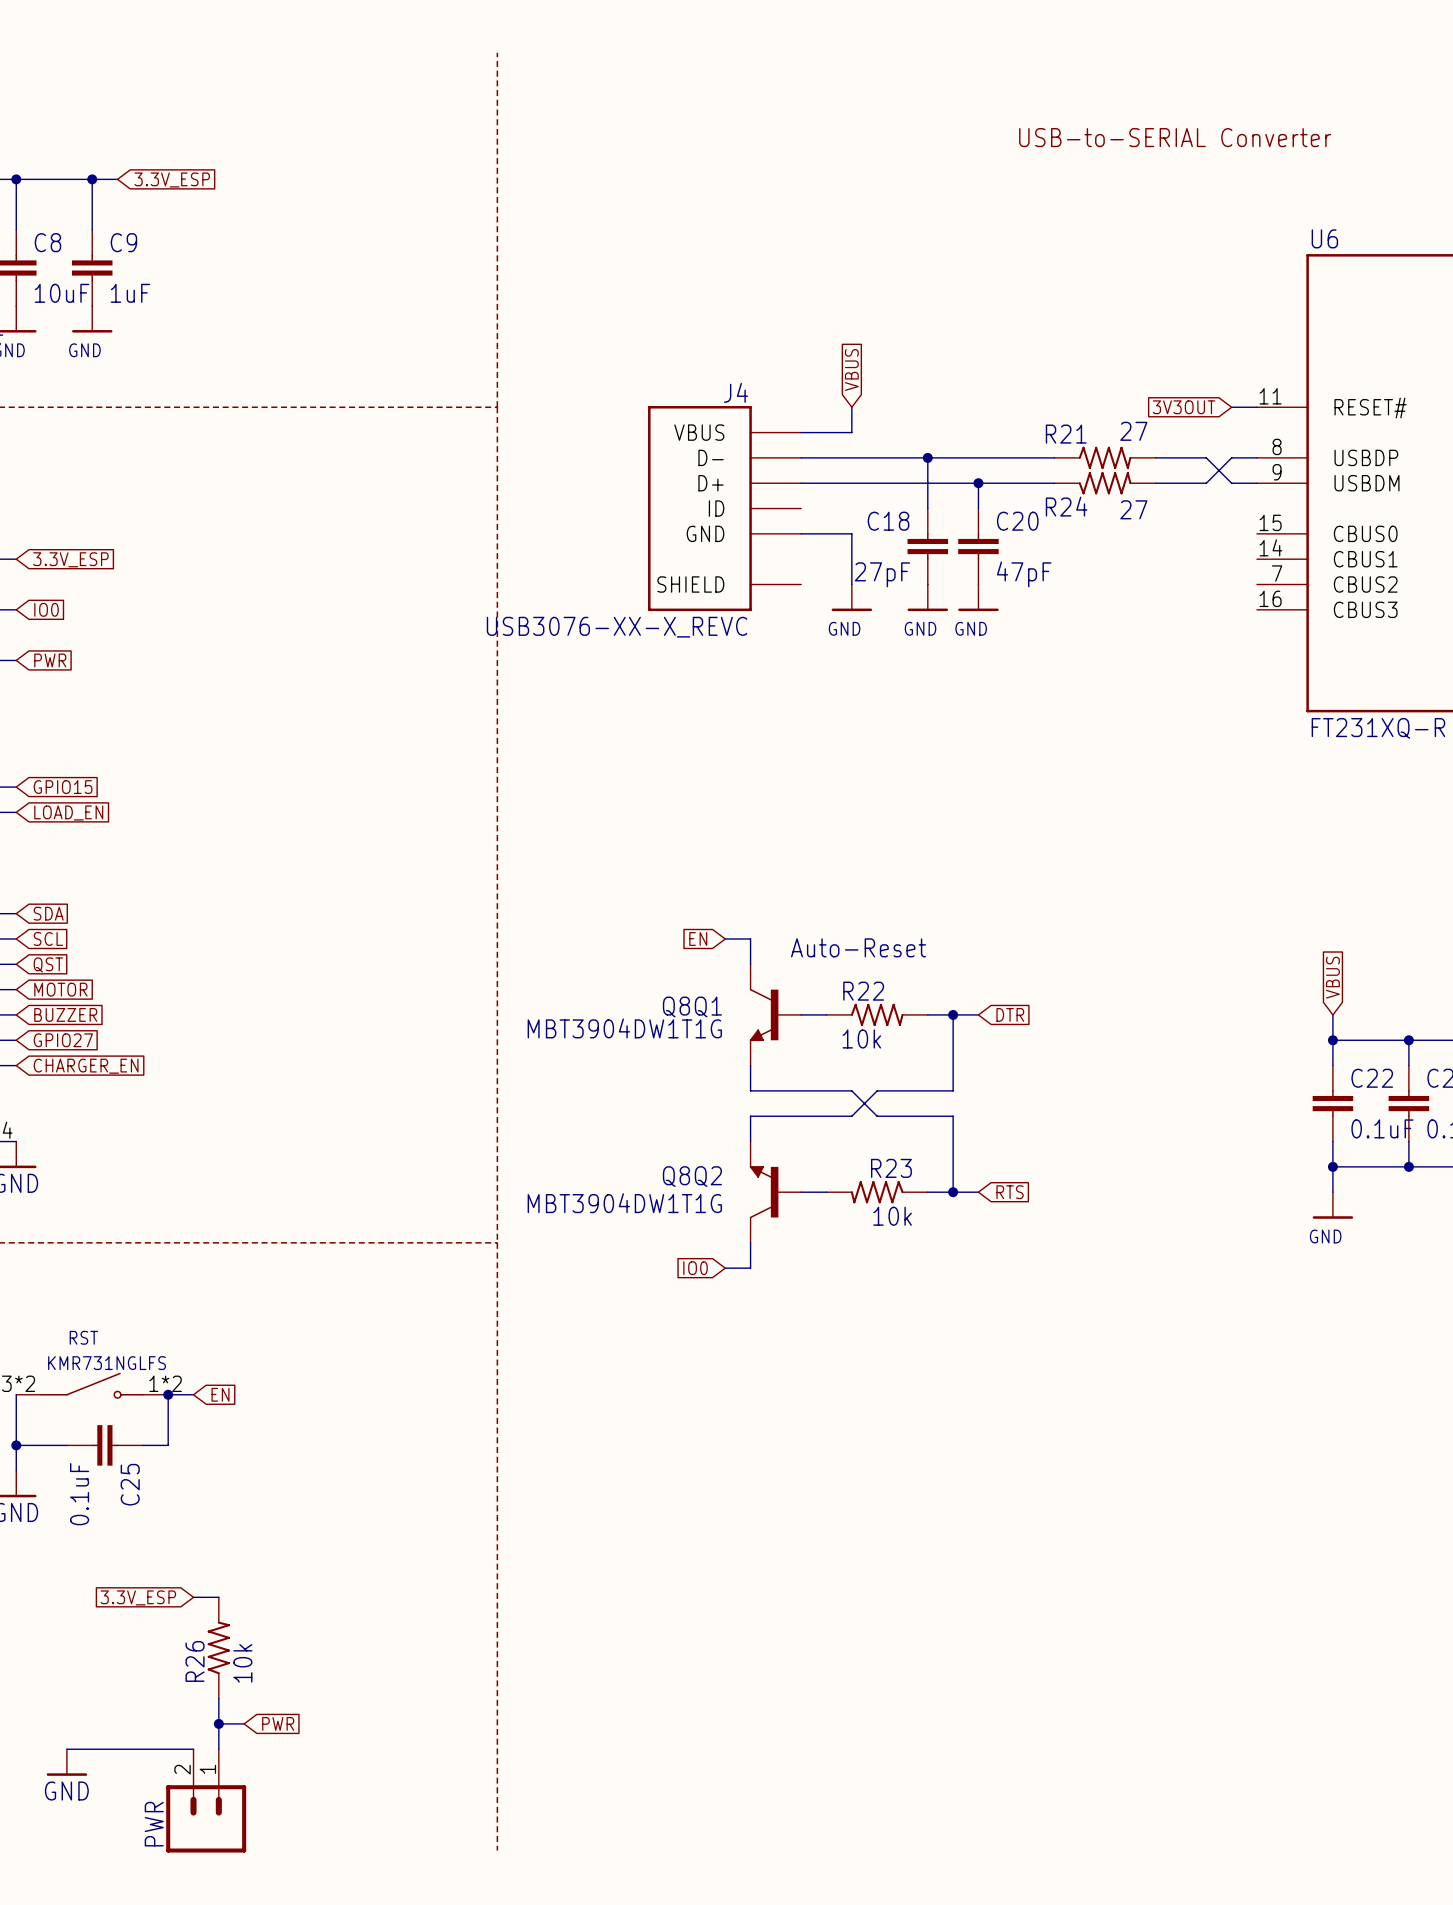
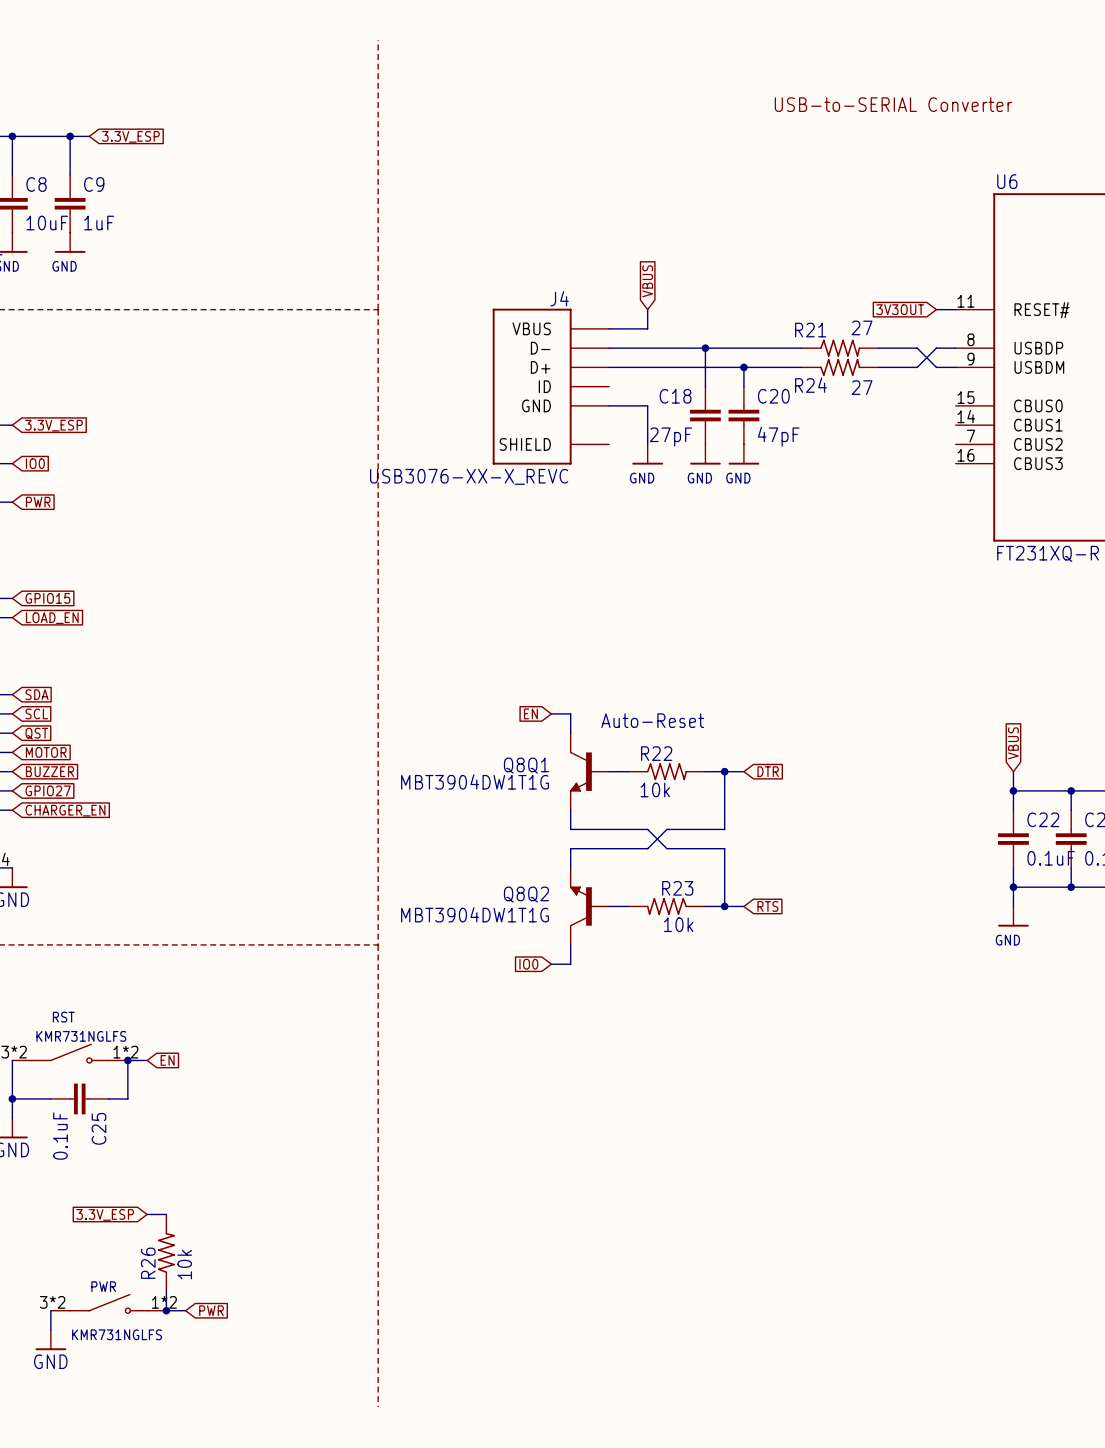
PWR: none -> KMR731NGLFS (108, 1303)
wire: (218, 1723) (218, 1749) -> none
wire: (66, 1749) (193, 1749) -> (50, 1329) (50, 1310)
PWR: (206, 1800) -> none

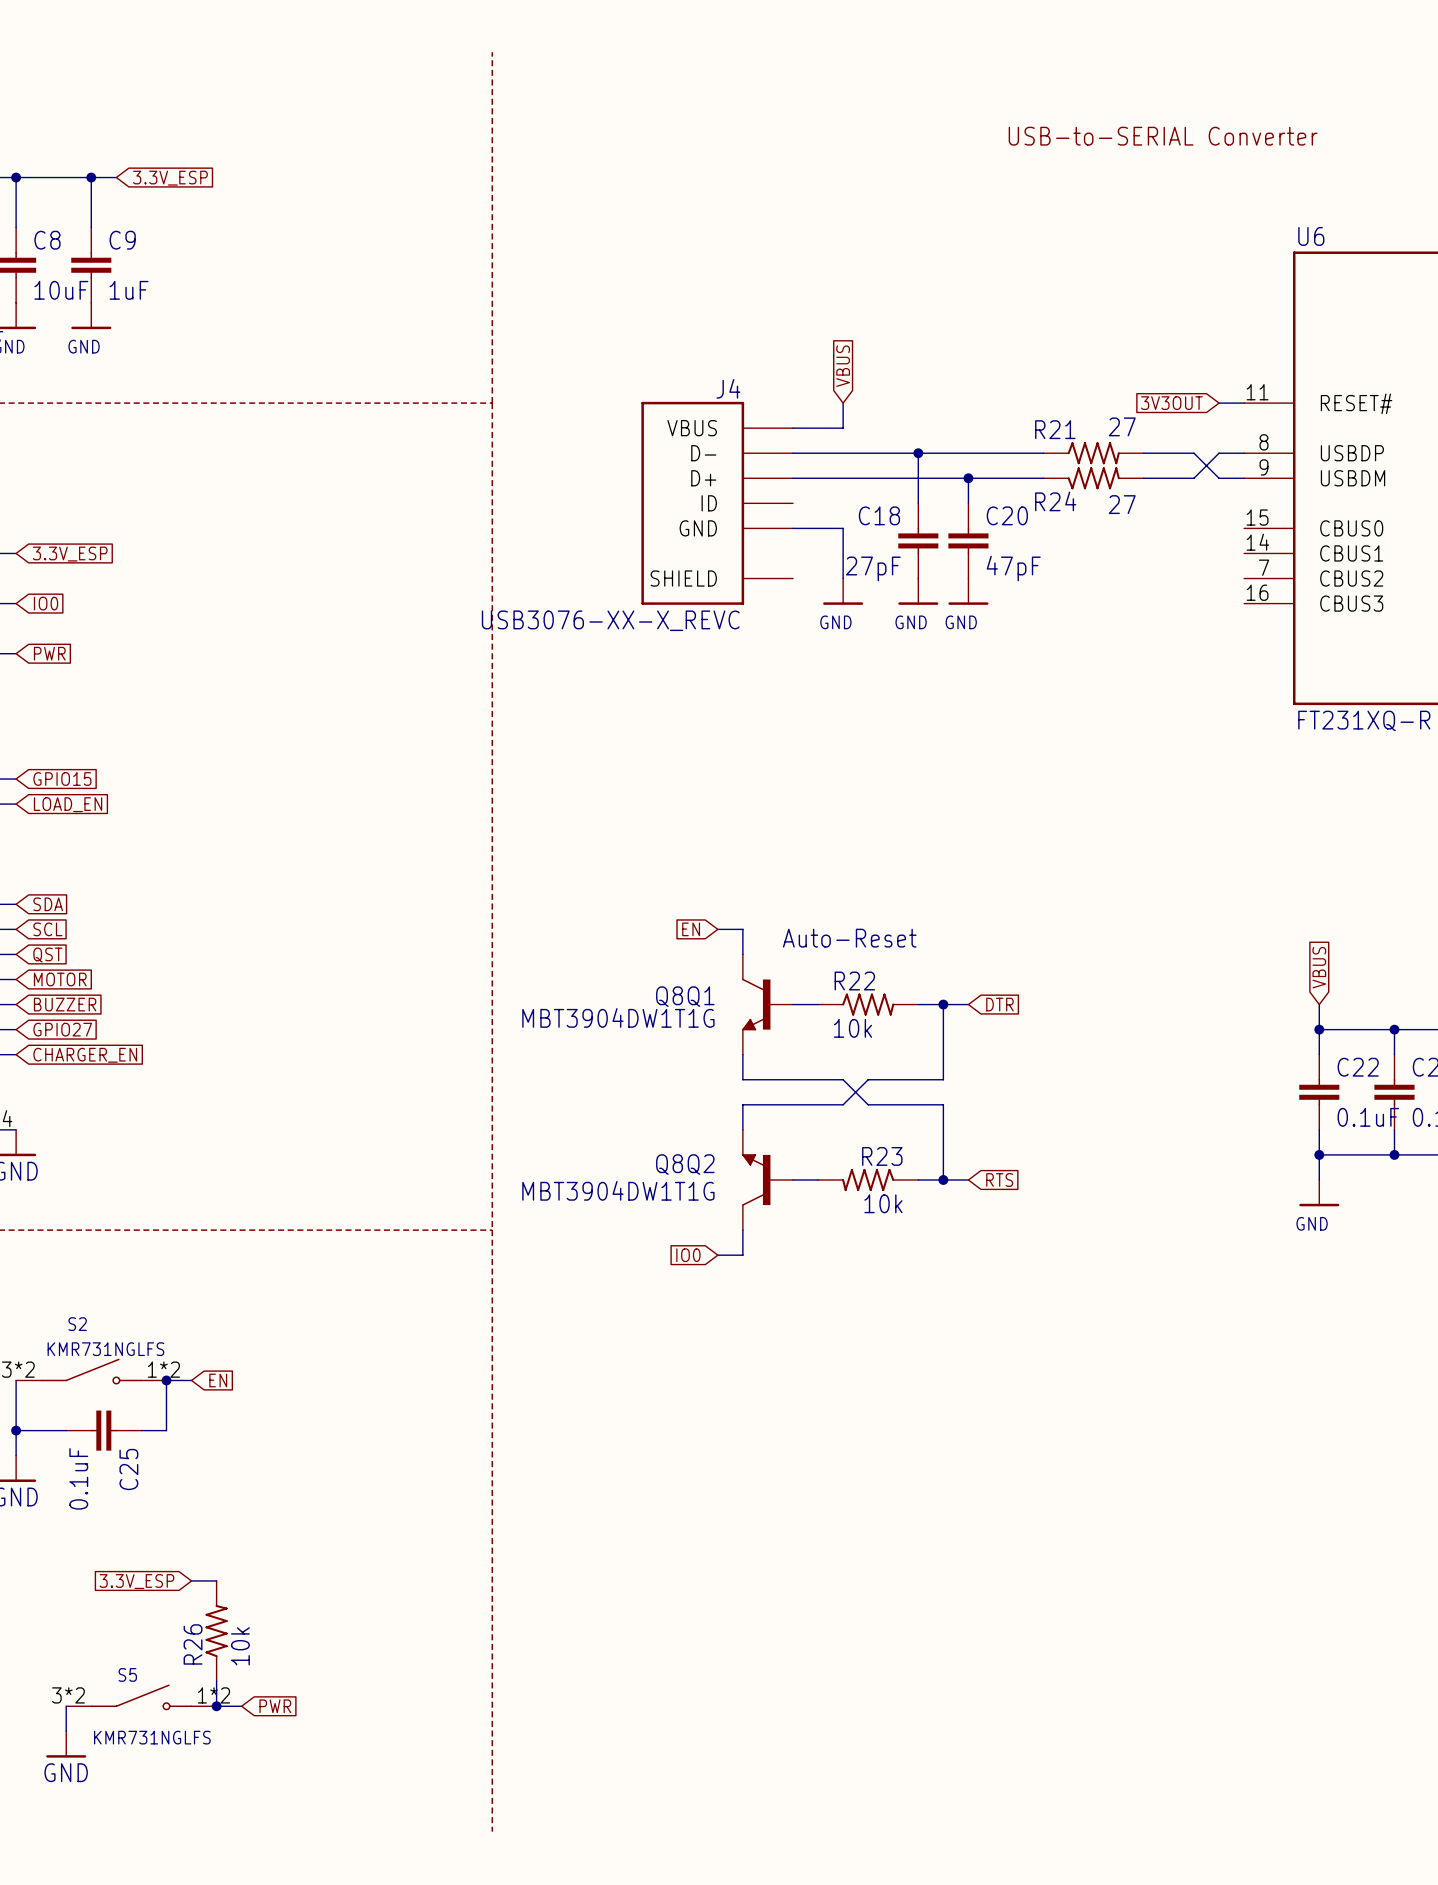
RST name: RST (63, 1017) -> S2 (77, 1324)
PWR name: PWR (103, 1286) -> S5 (127, 1674)

